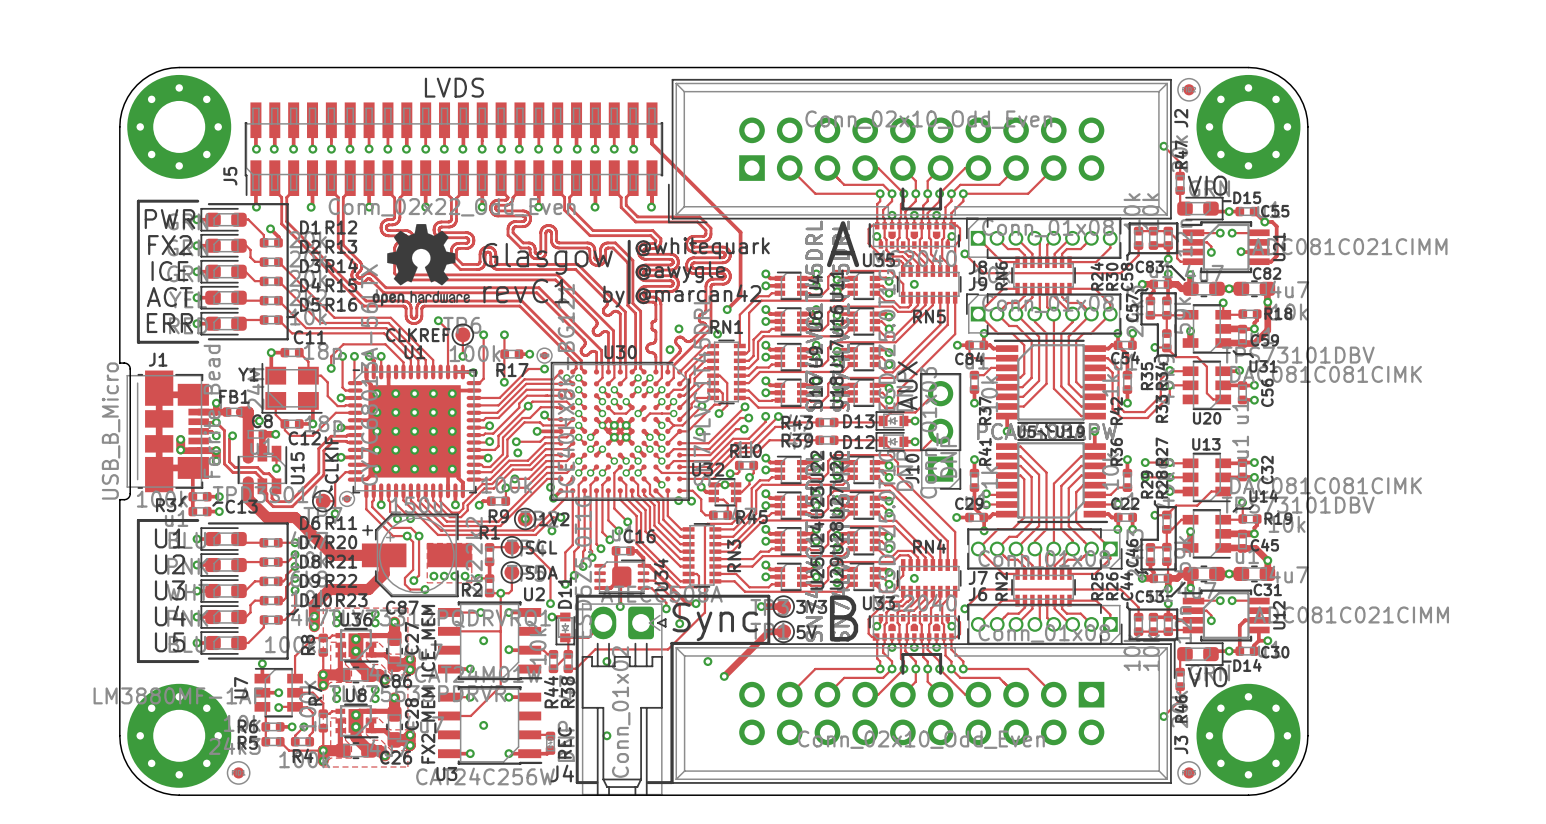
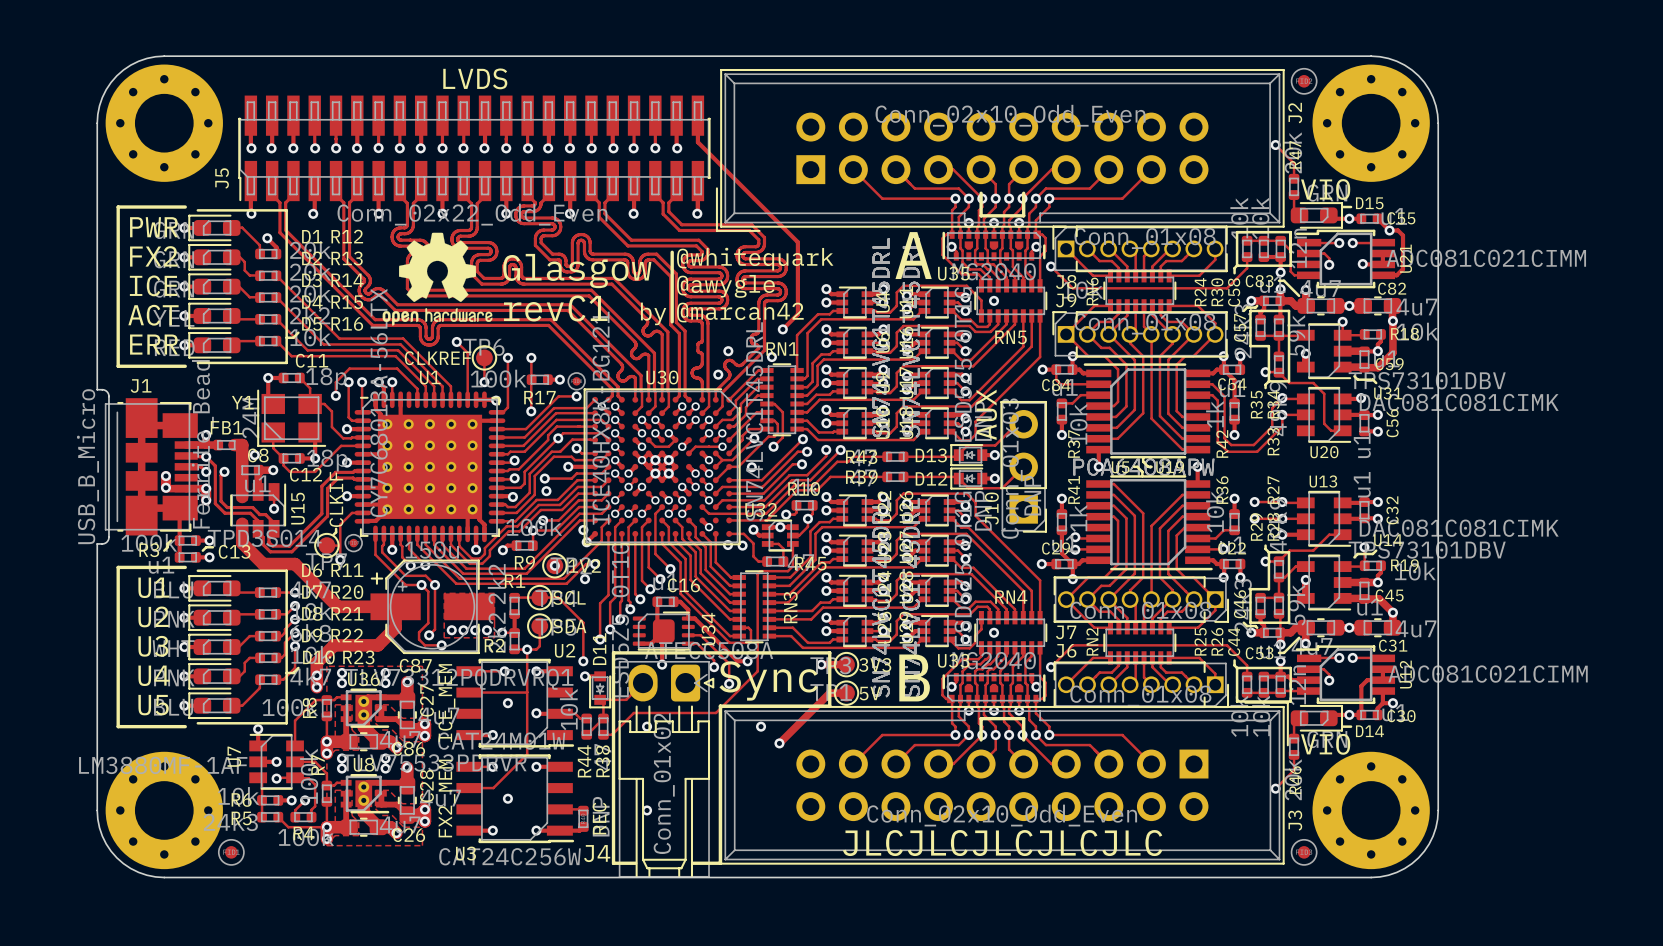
text: none -> JLCJLCJLCJLCJLC (1002, 843)

